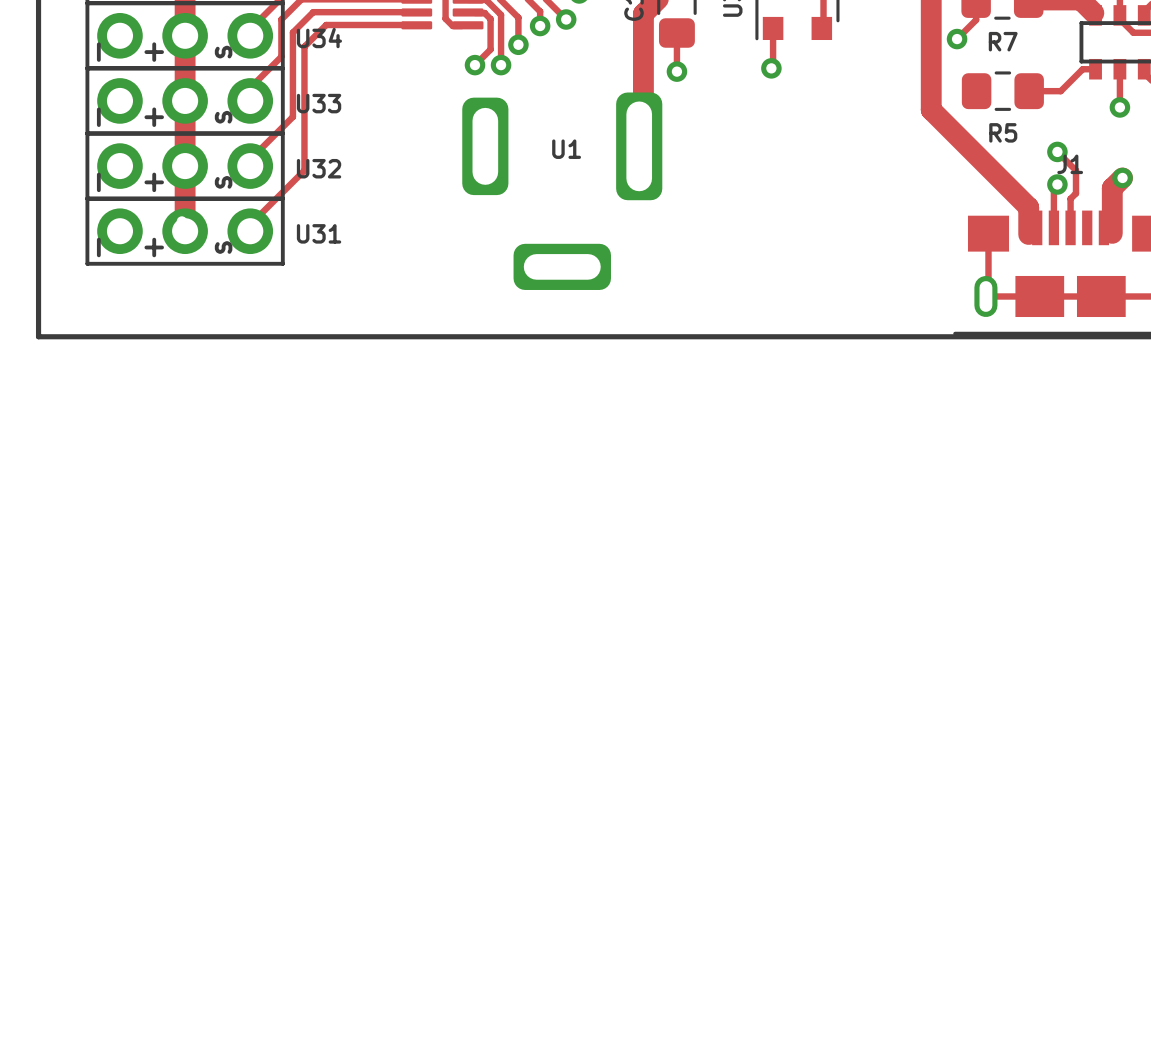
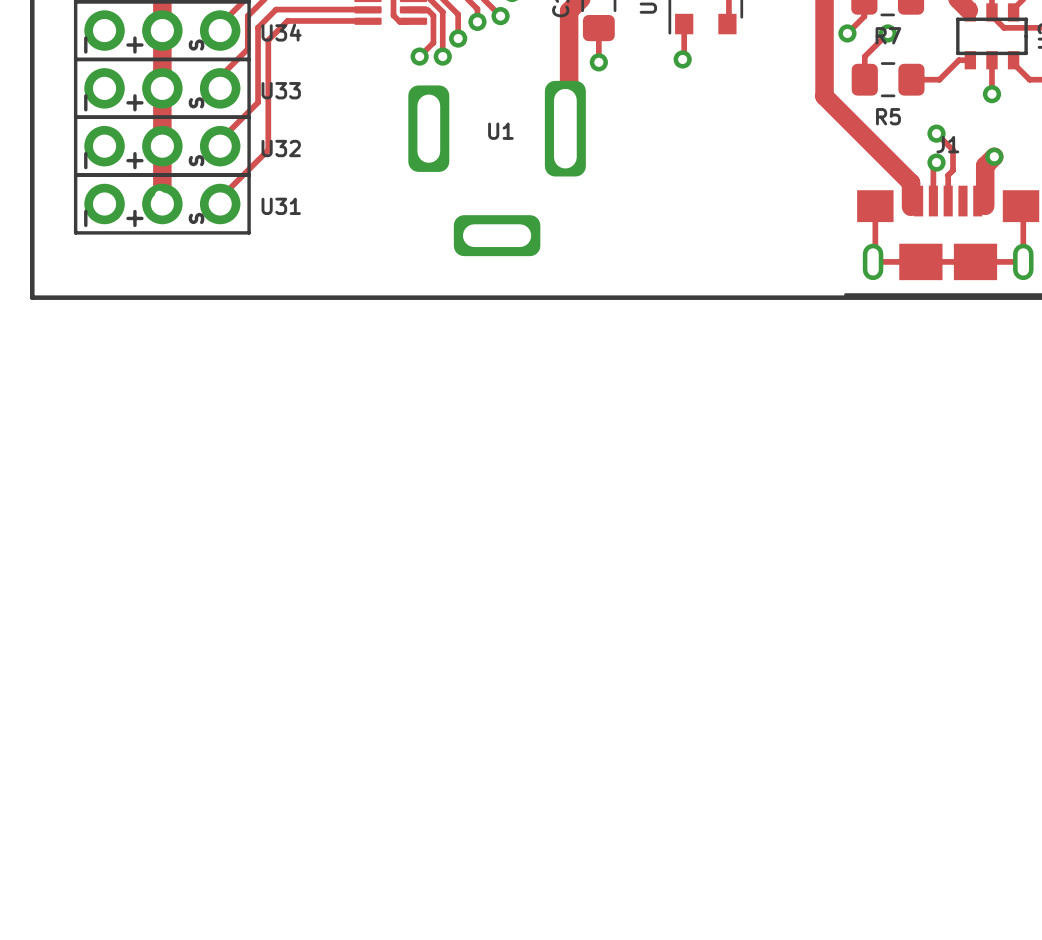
track: none -> (887, 33) (864, 56) (864, 79)
via: none -> (887, 33)

